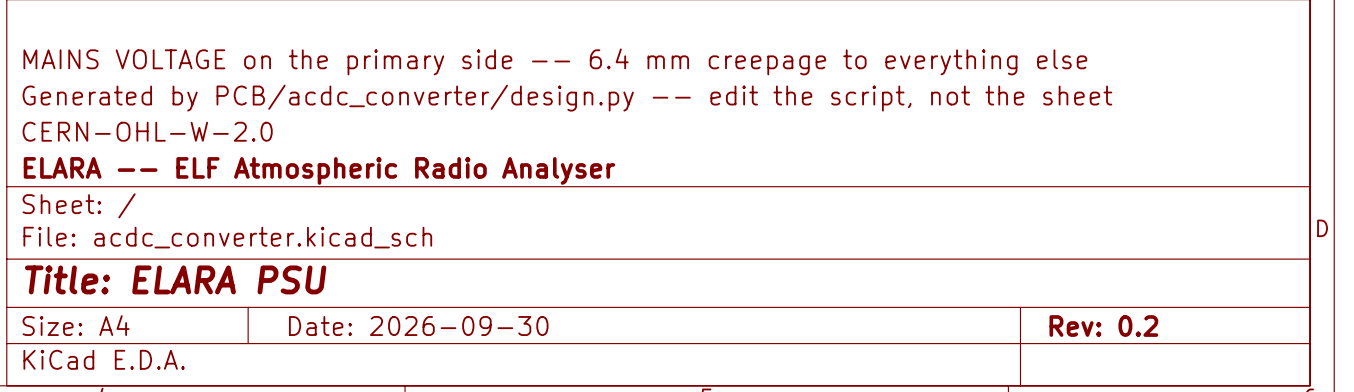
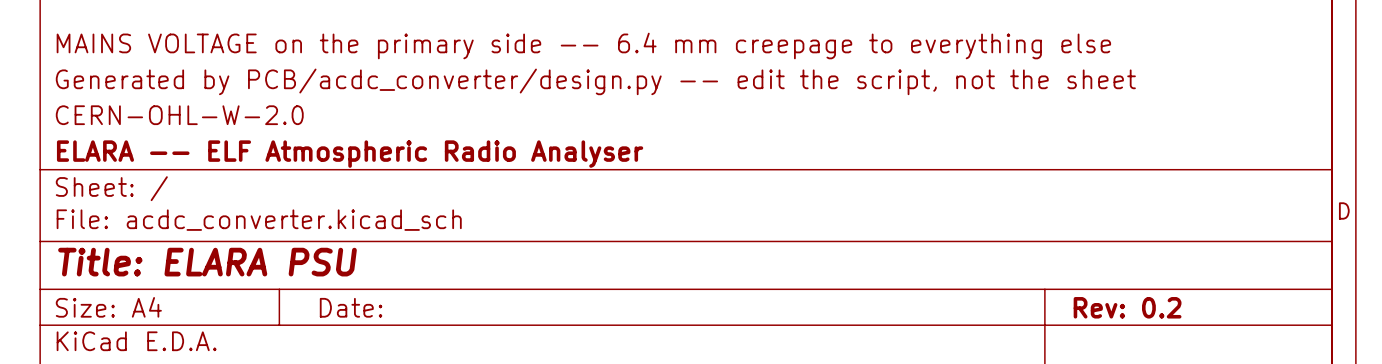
title block: Date: 2026-09-30 (418, 326) -> Date: (351, 307)

